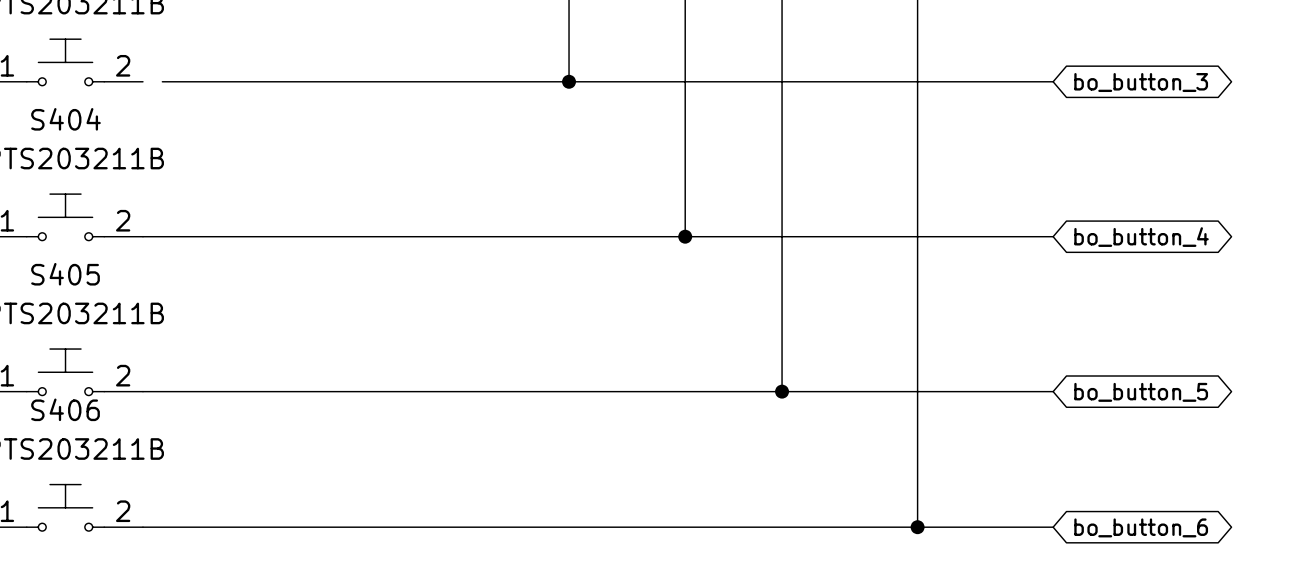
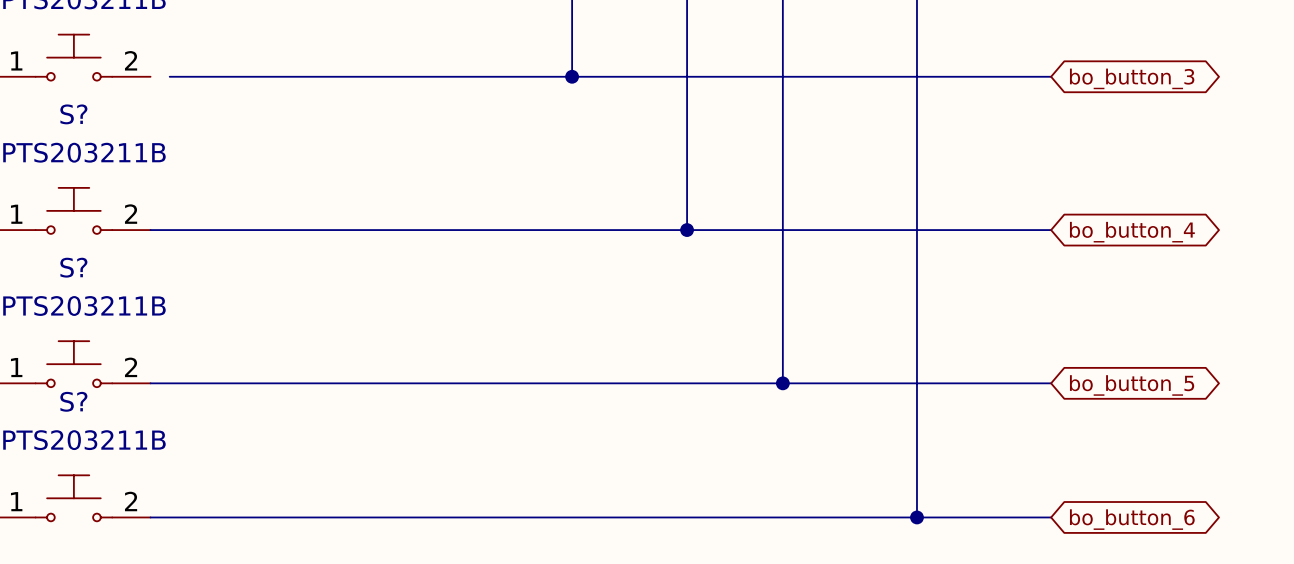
S404 name: S404 (65, 119) -> S? (73, 114)
S405 name: S405 (65, 274) -> S? (73, 267)
S406 name: S406 (65, 409) -> S? (73, 401)

